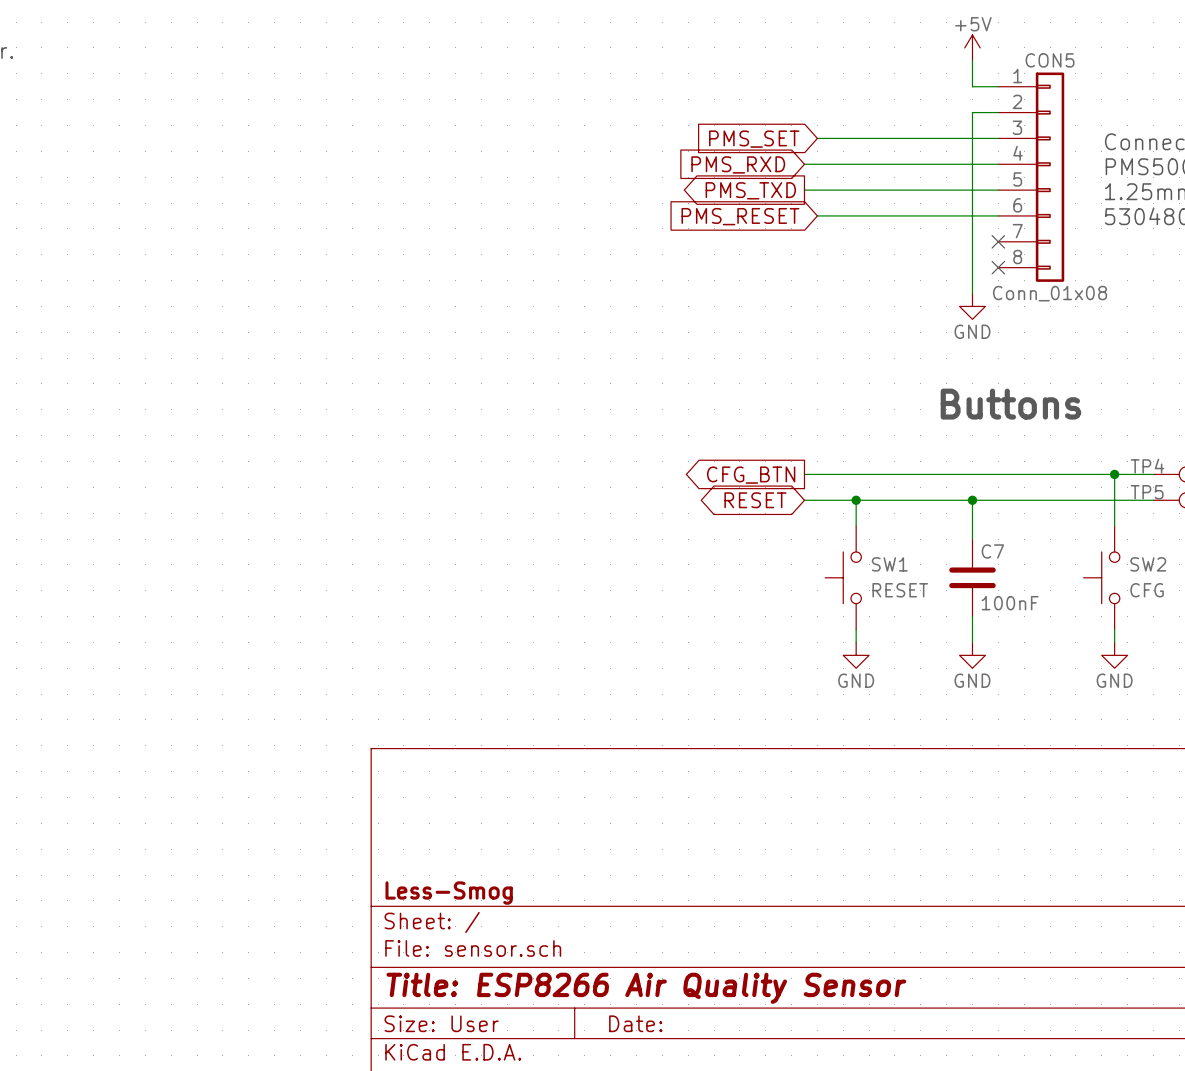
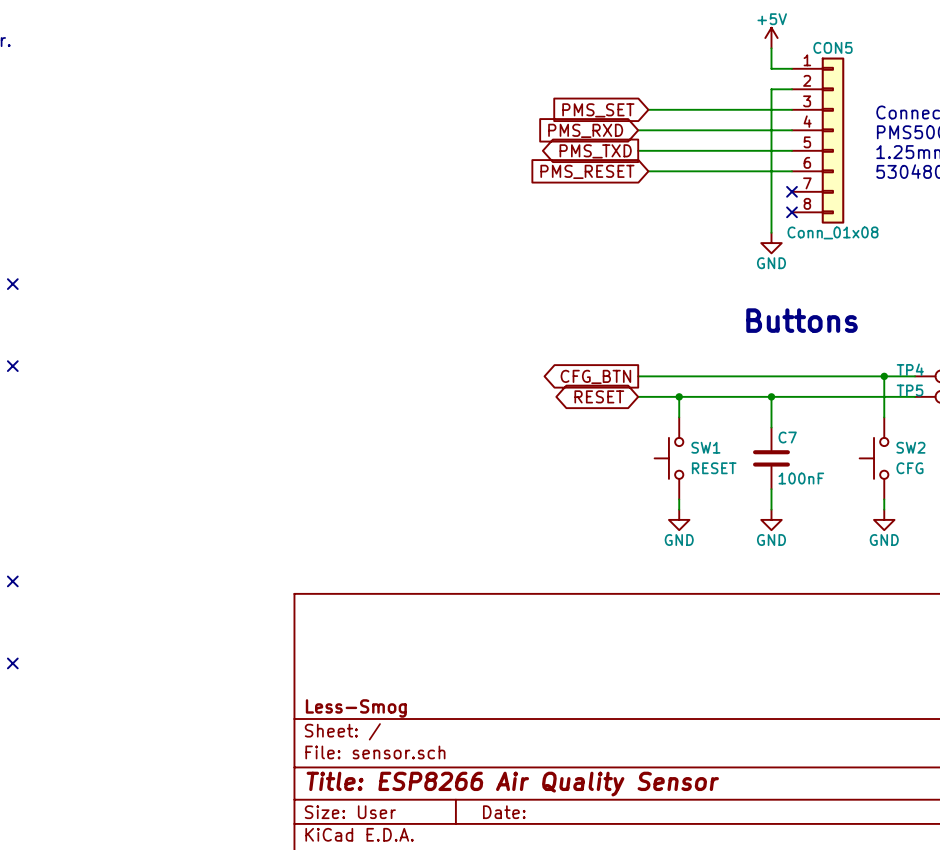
no-connect mark: none -> (12, 284)
no-connect mark: none -> (12, 366)
no-connect mark: none -> (12, 581)
no-connect mark: none -> (12, 663)

